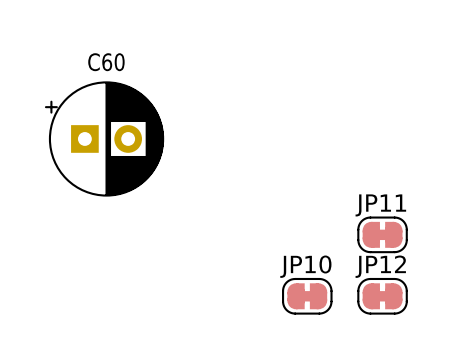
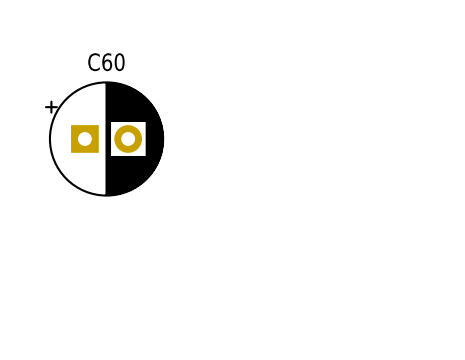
JP11: (382, 234) -> none
JP10: (307, 296) -> none
JP12: (382, 296) -> none

